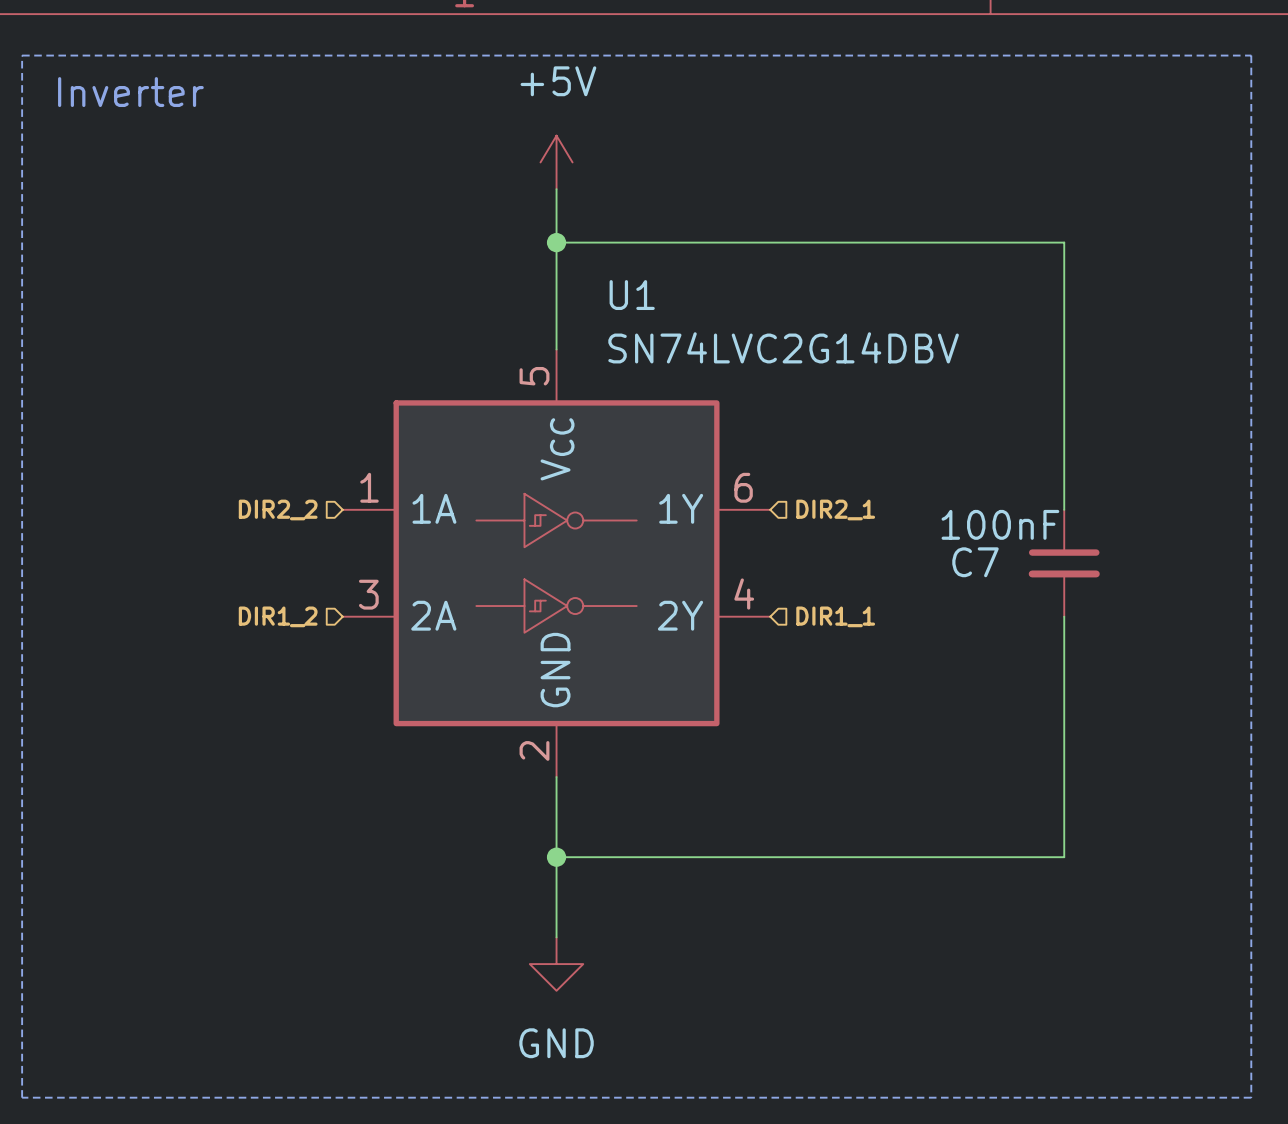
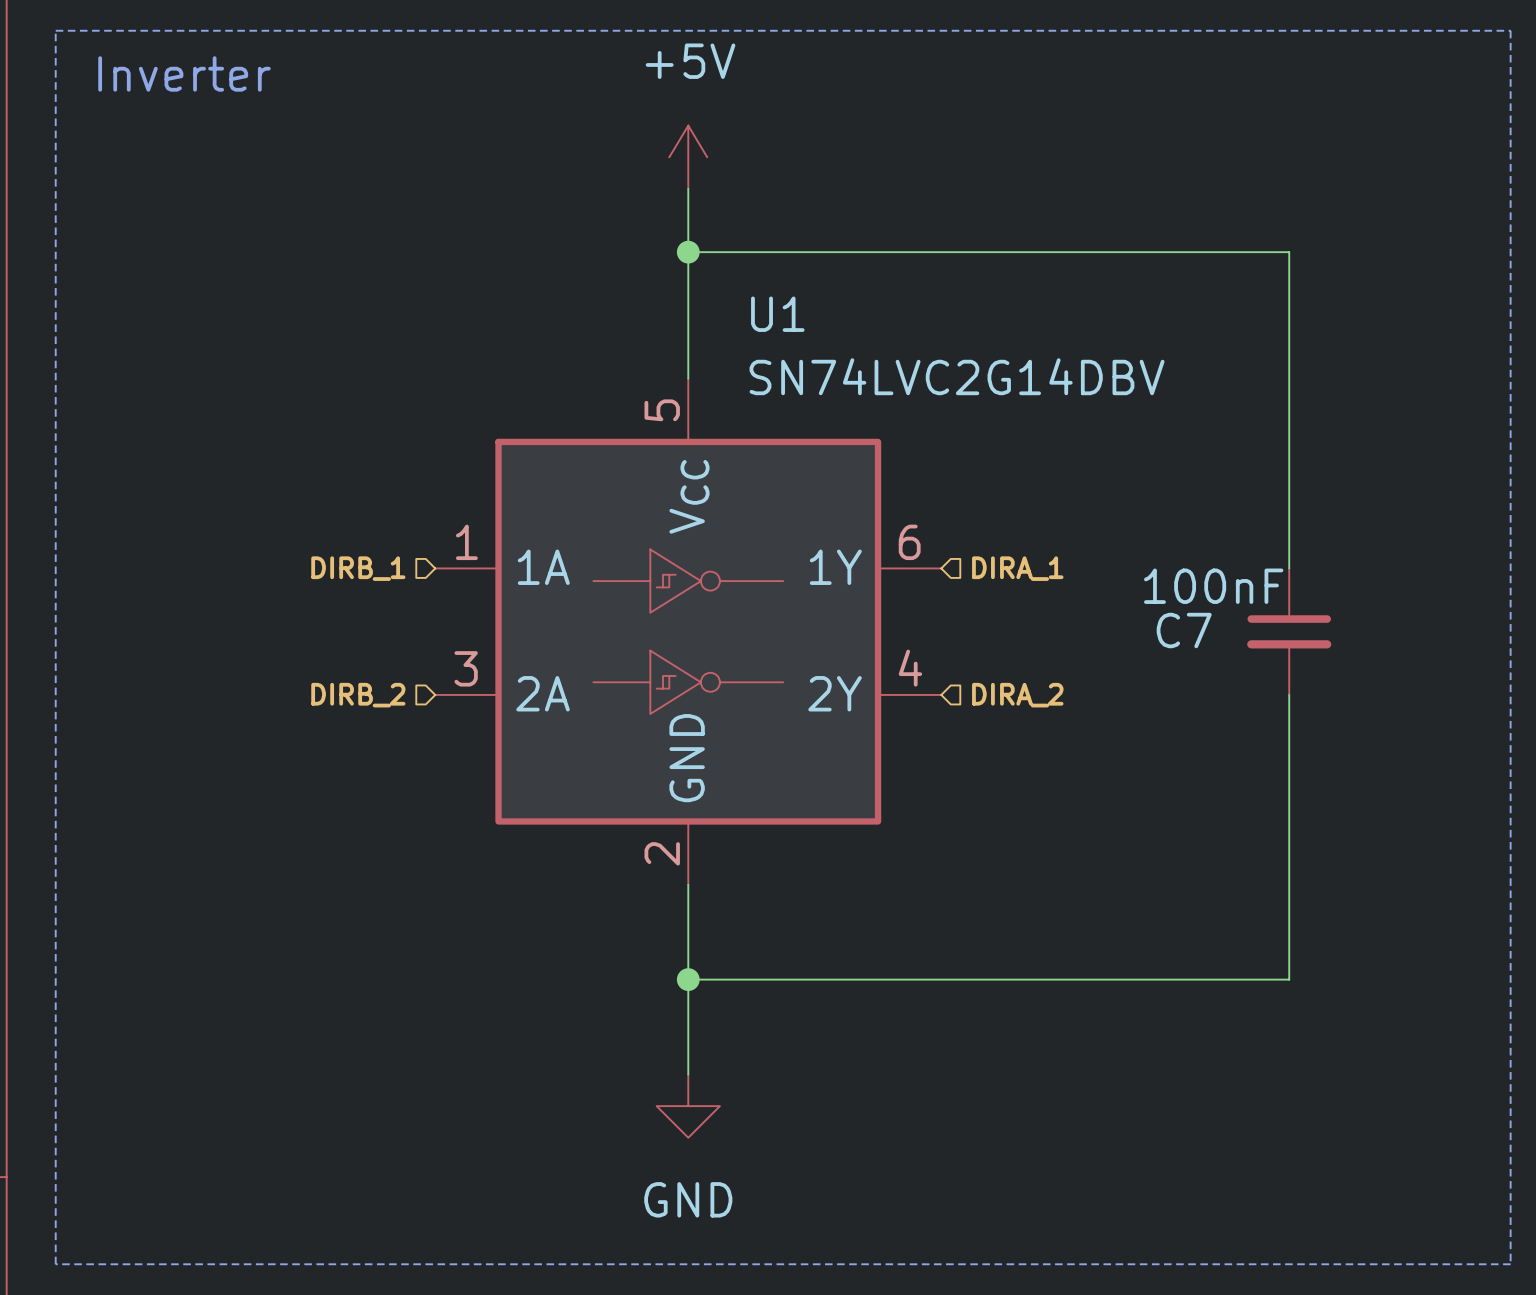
hierarchical label: DIR2_2 (278, 509) -> DIRB_1 (358, 568)
hierarchical label: DIR2_1 (835, 509) -> DIRA_1 (1017, 568)
hierarchical label: DIR1_2 (278, 616) -> DIRB_2 (358, 695)
hierarchical label: DIR1_1 (835, 616) -> DIRA_2 (1017, 695)

